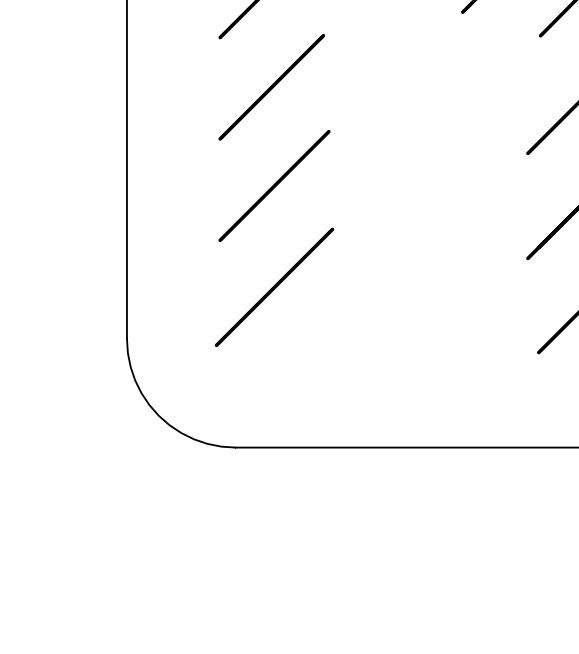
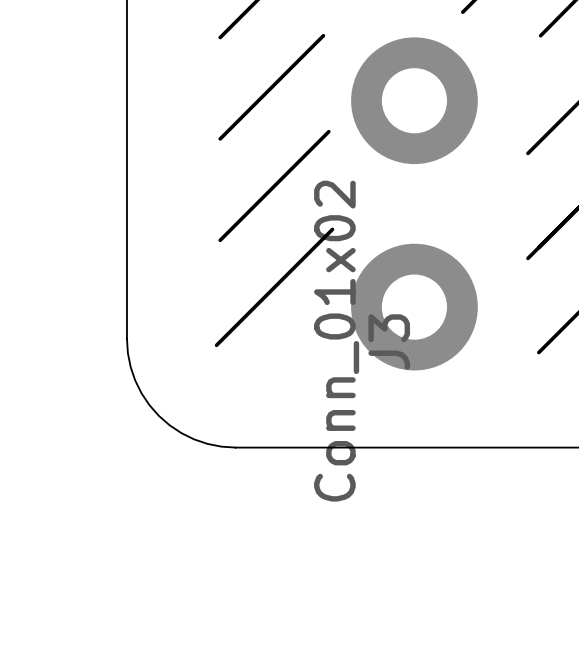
part: none -> Conn_01x02 (414, 203)

